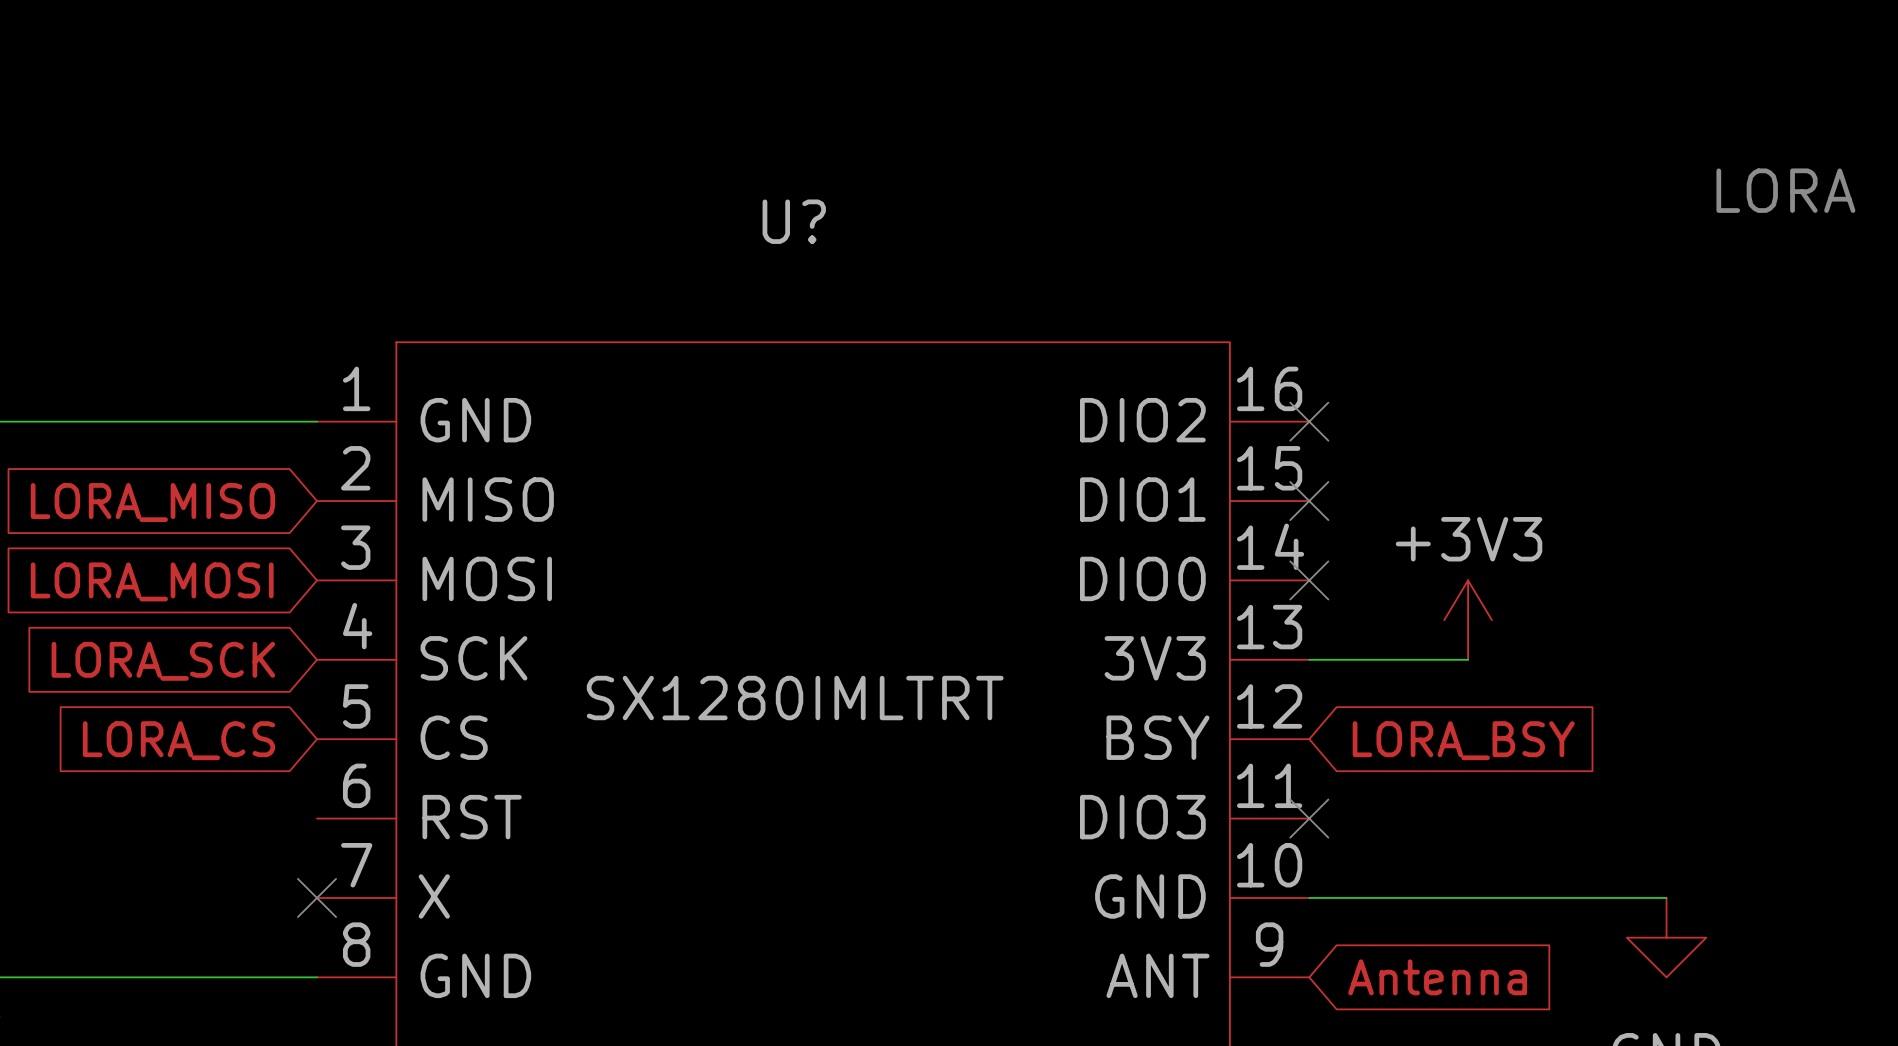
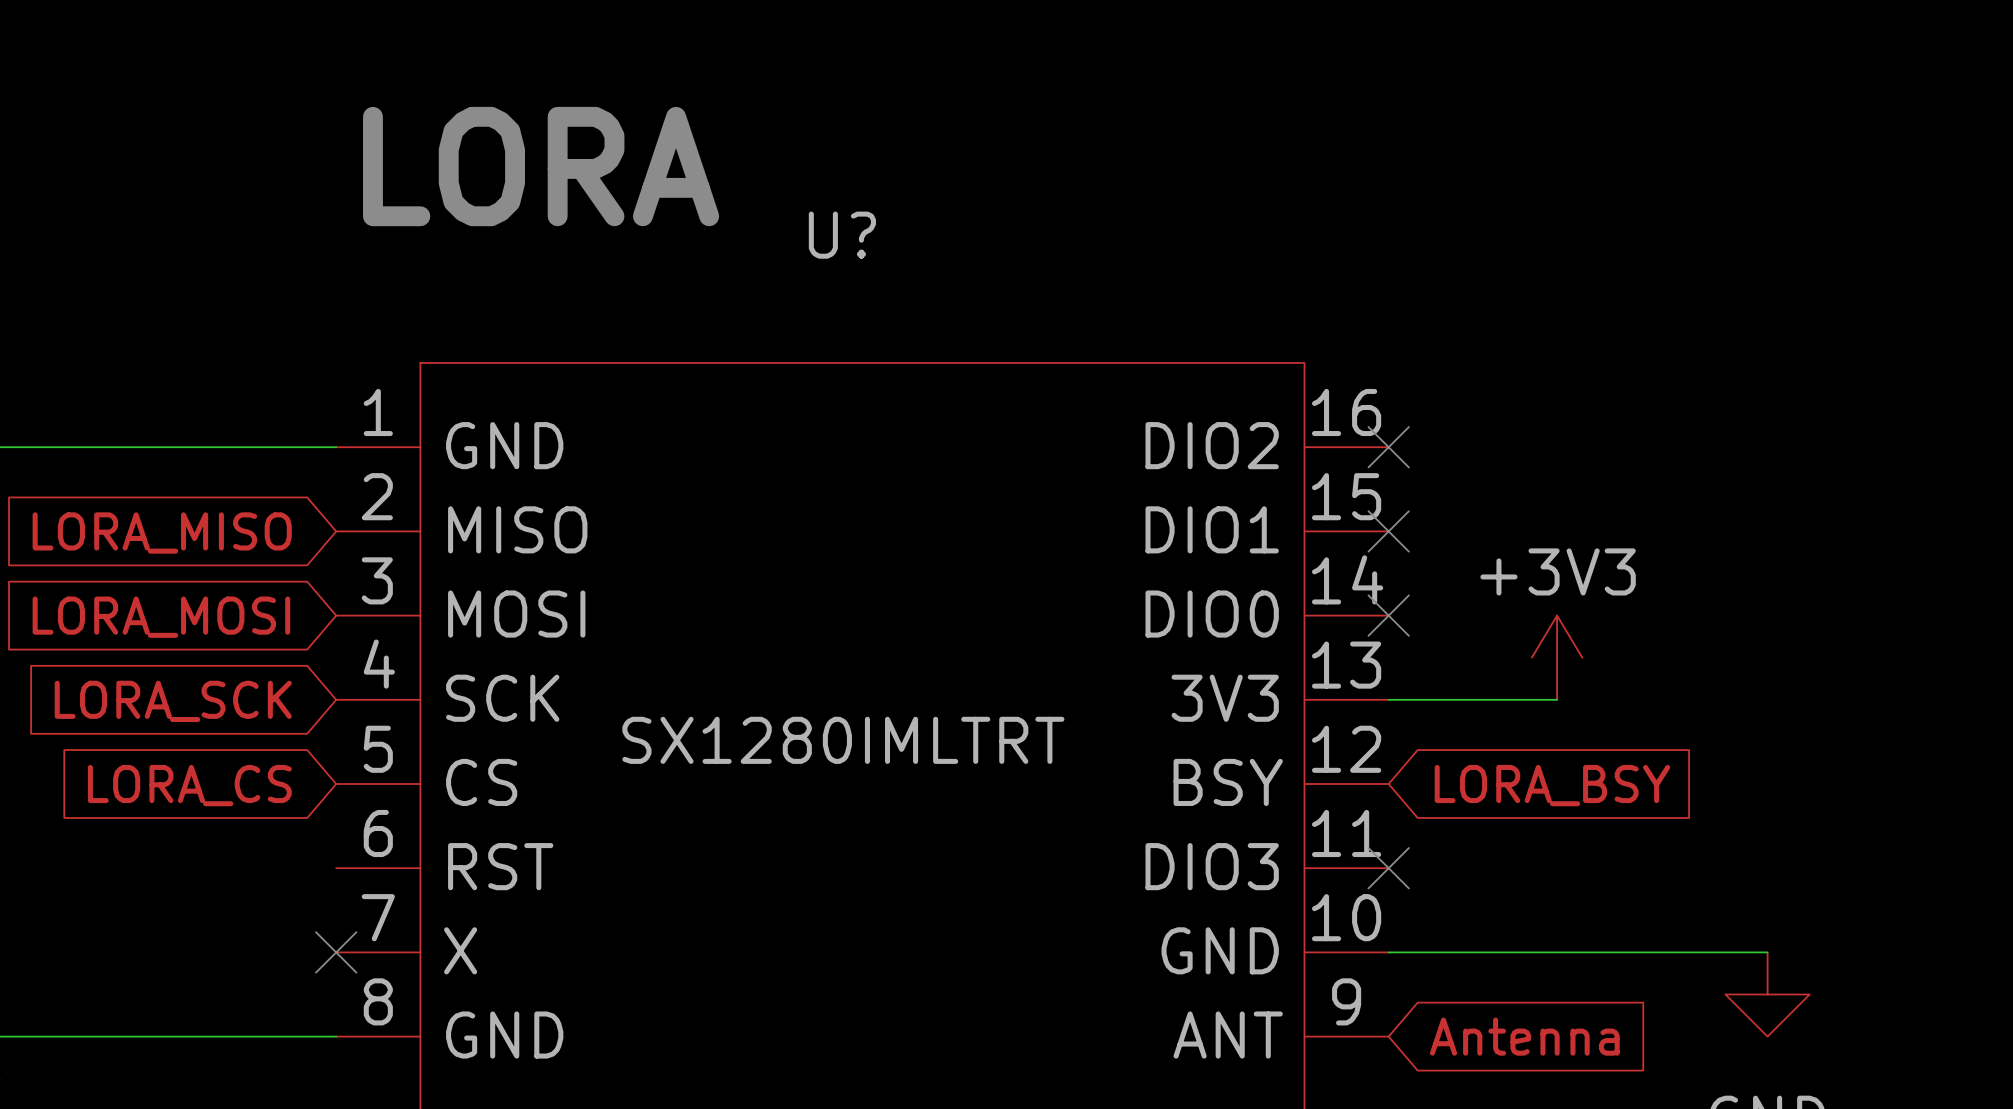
text: none -> LORA (541, 166)
text: LORA (1785, 190) -> none

